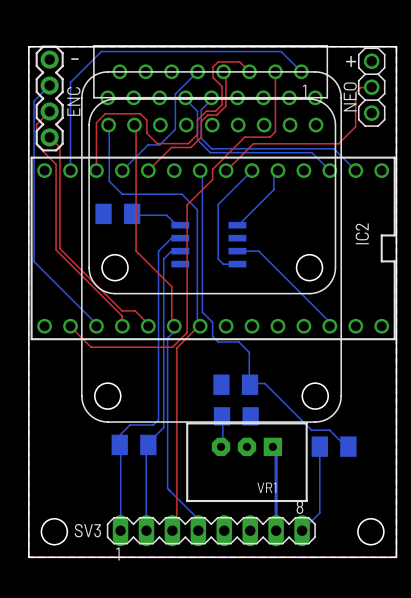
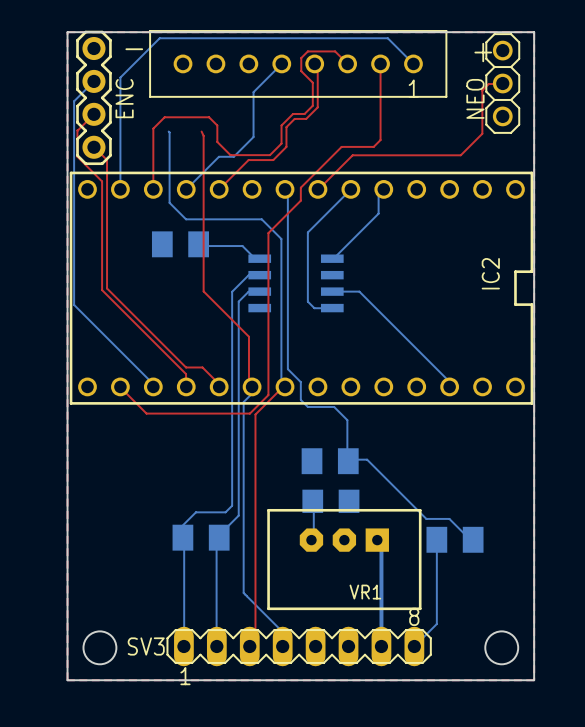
bottom track: (185, 97) (197, 111) (197, 139) (210, 152) (311, 152) (329, 170) -> none
bottom track: (211, 97) (201, 109) (201, 138) (211, 148) (333, 148) (355, 170) -> none
part: (212, 196) -> none
part: (211, 246) -> none

